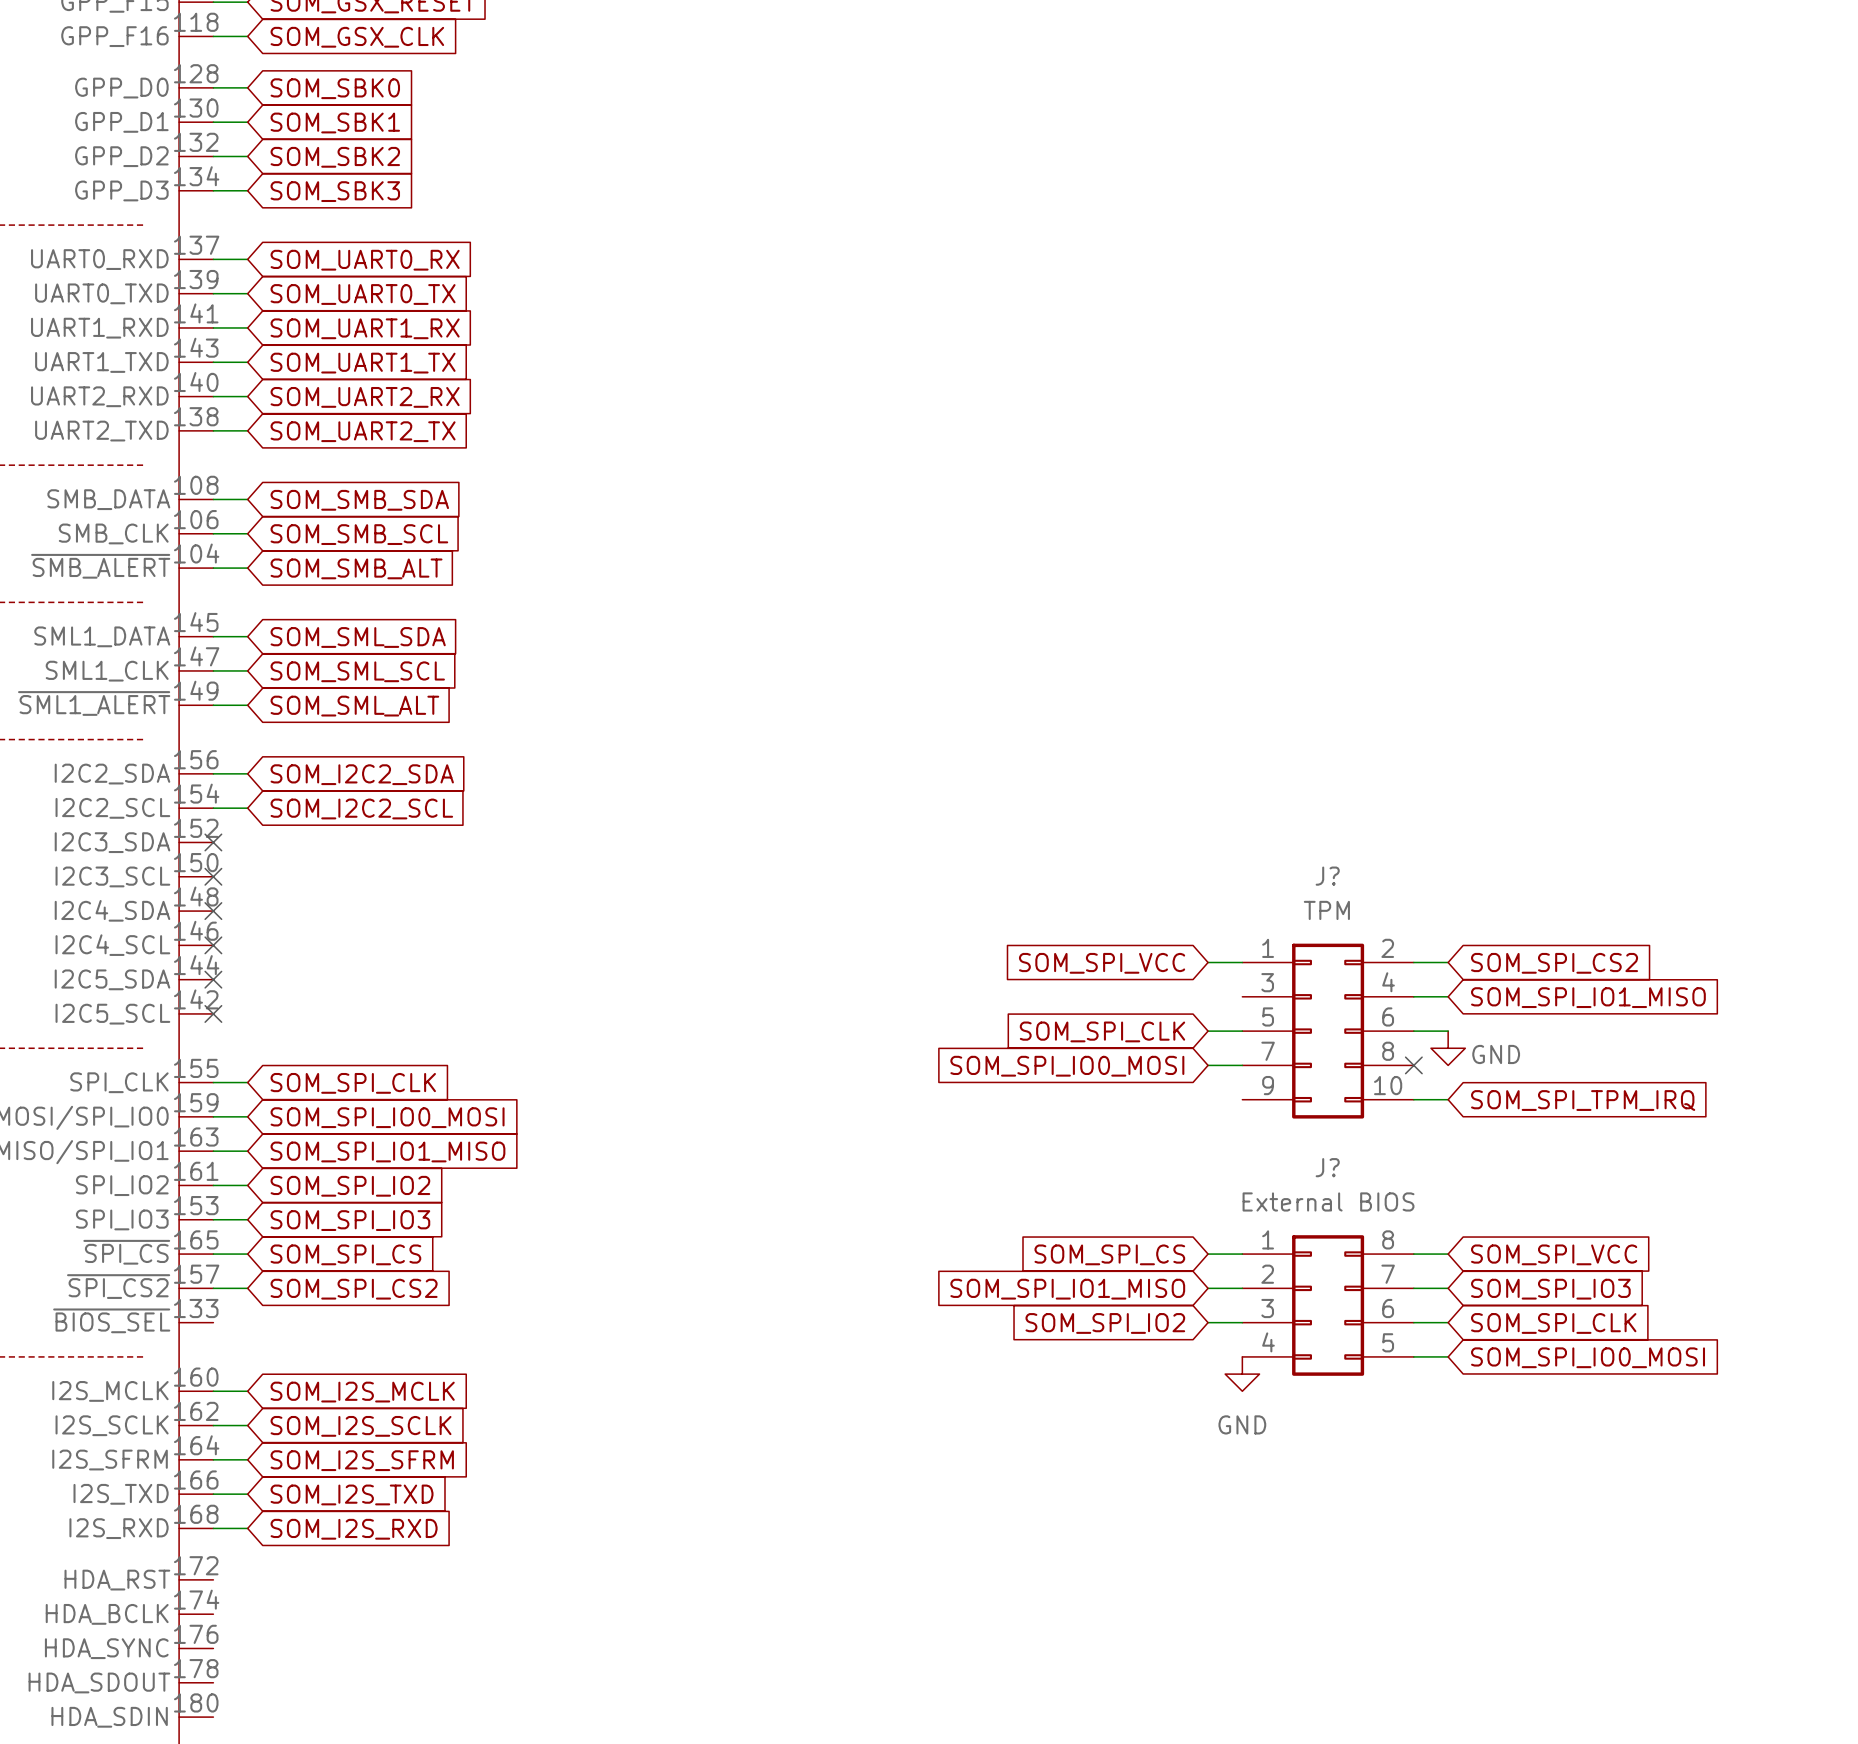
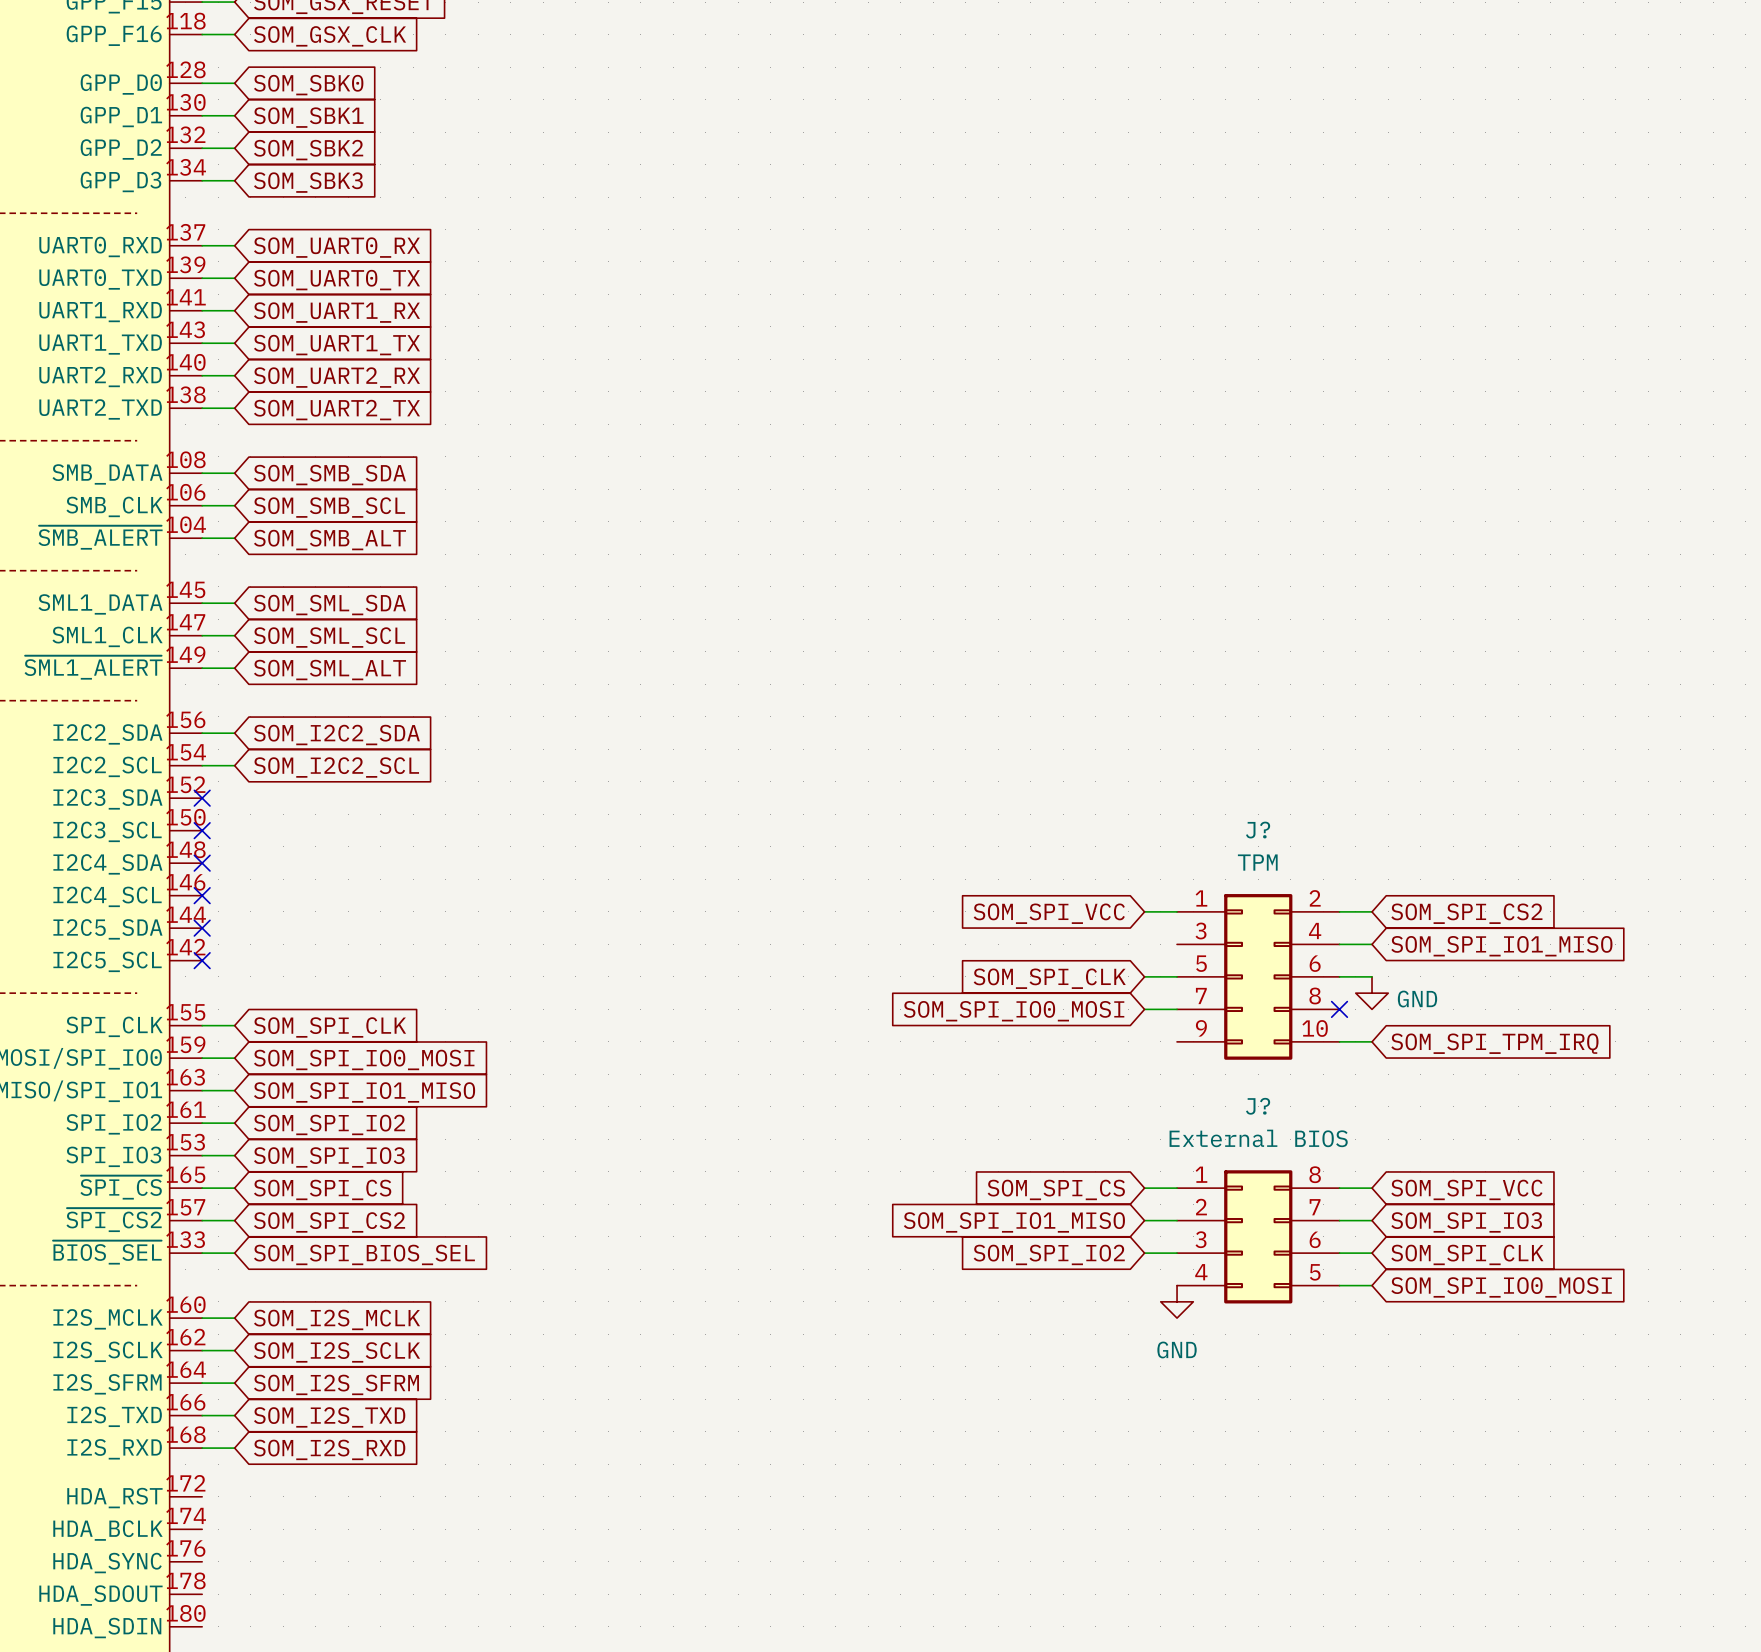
wire: none -> (202, 1253) (234, 1253)
global label: none -> SOM_SPI_BIOS_SEL (364, 1254)

